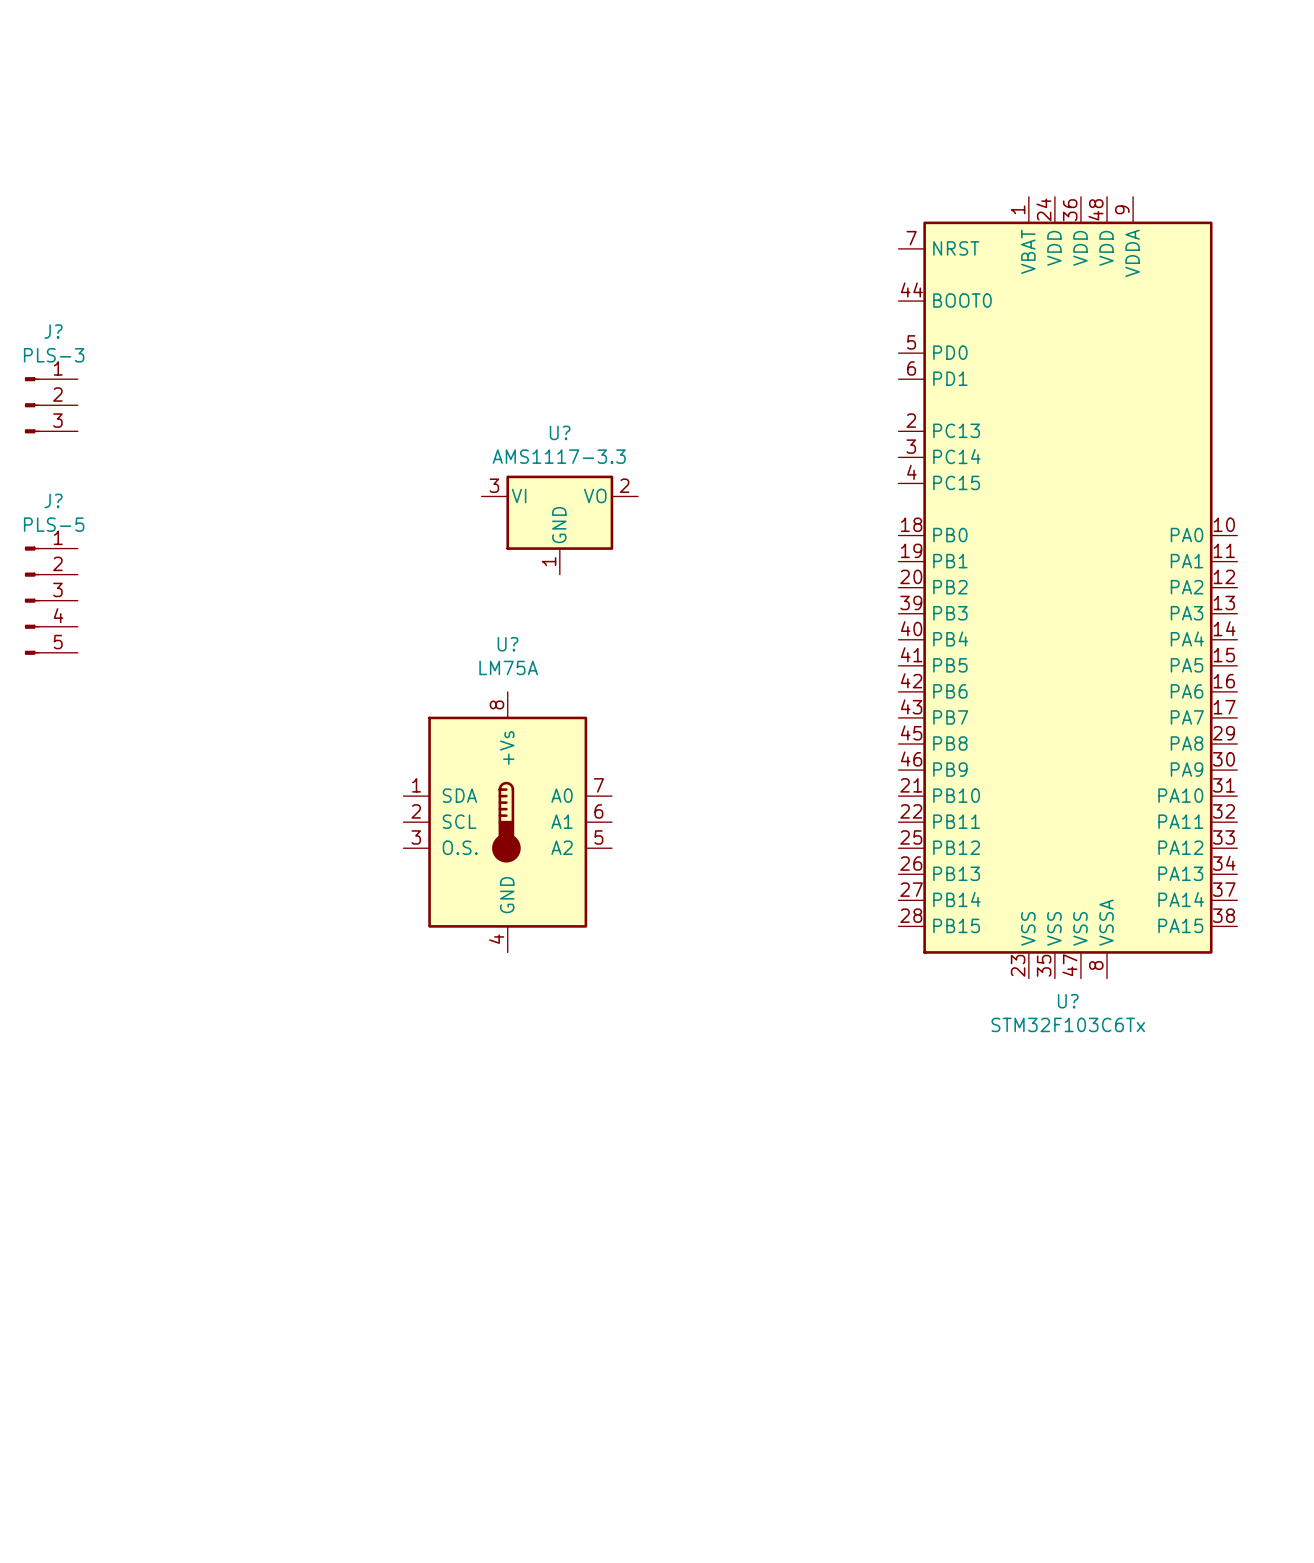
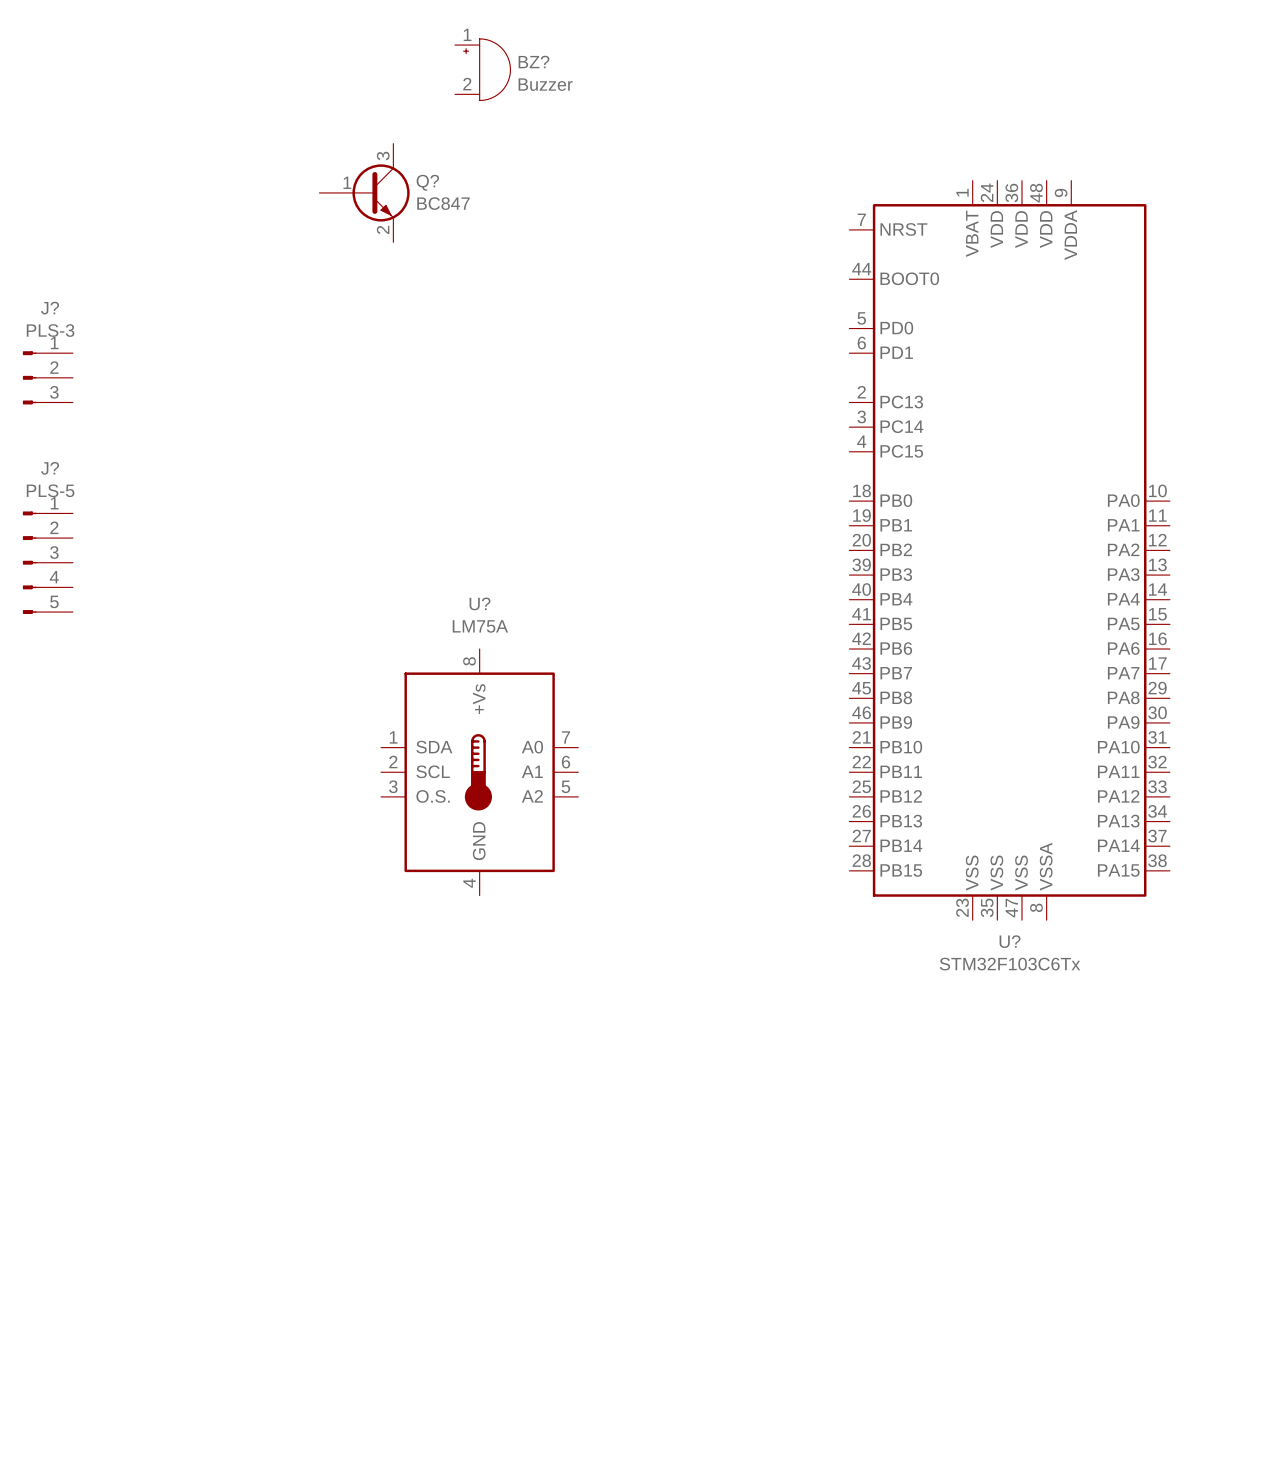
BZ?: none -> Buzzer (482, 69)
Q?: none -> BC847 (364, 192)
U?: AMS1117-3.3 (559, 525) -> none

